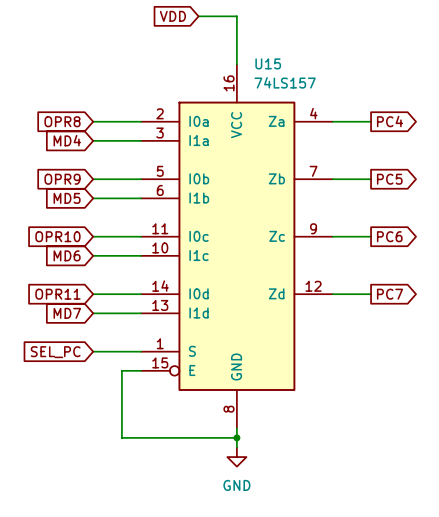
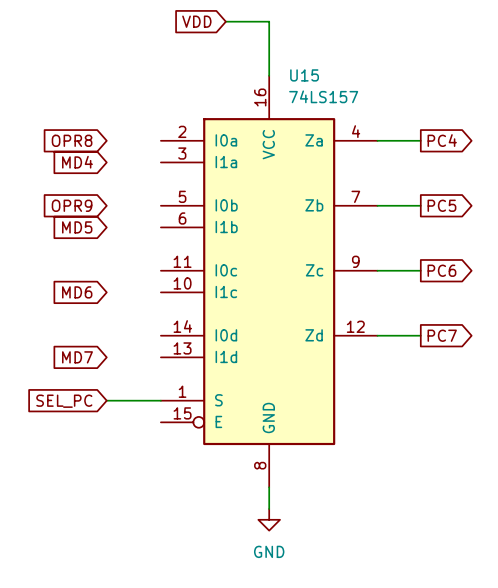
wire: (93, 121) (141, 121) -> none
wire: (93, 140) (141, 140) -> none
wire: (93, 179) (141, 179) -> none
wire: (93, 198) (141, 198) -> none
global label: OPR10 (57, 236) -> none
wire: (93, 236) (141, 236) -> none
wire: (93, 255) (141, 255) -> none
global label: OPR11 (57, 294) -> none
wire: (93, 294) (141, 294) -> none
wire: (93, 313) (141, 313) -> none
wire: (141, 370) (121, 370) (121, 437) (236, 437) -> none
junction: (236, 437) -> none

